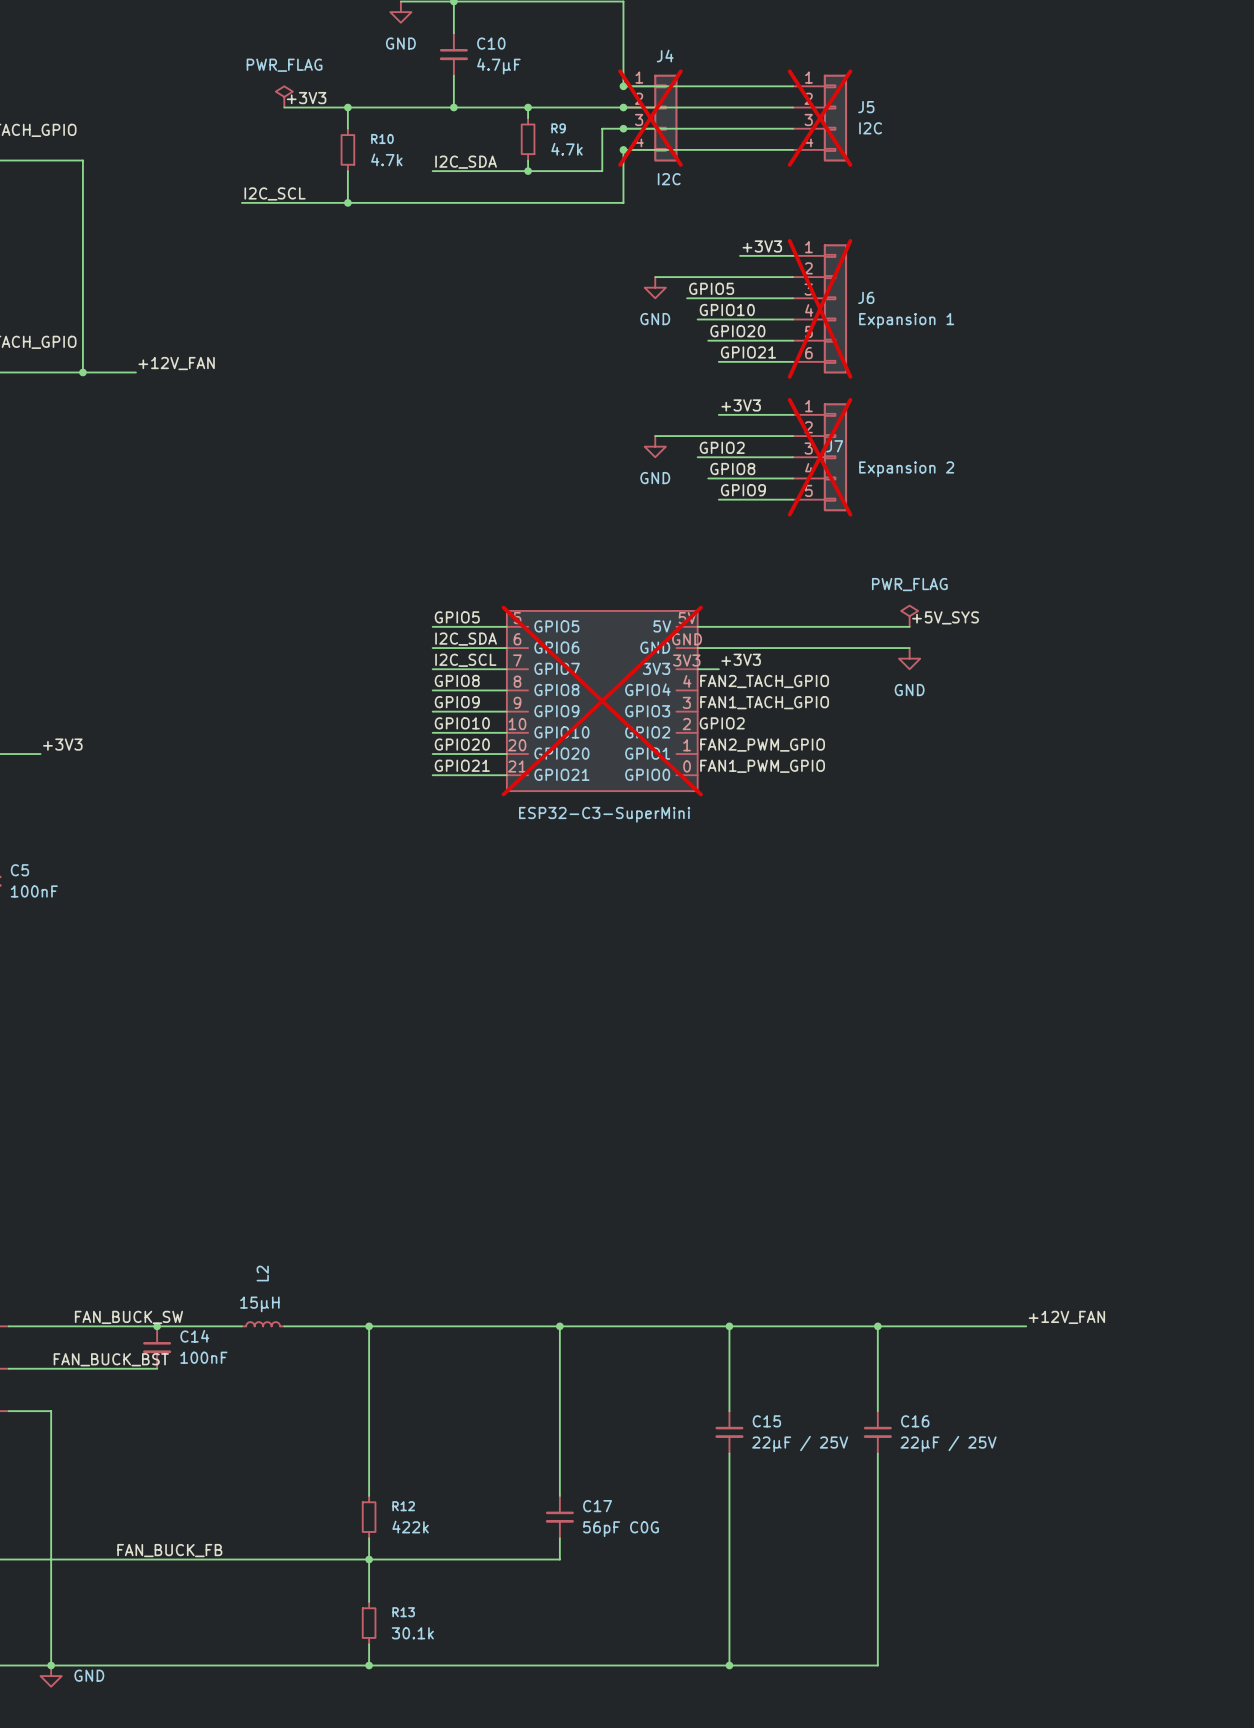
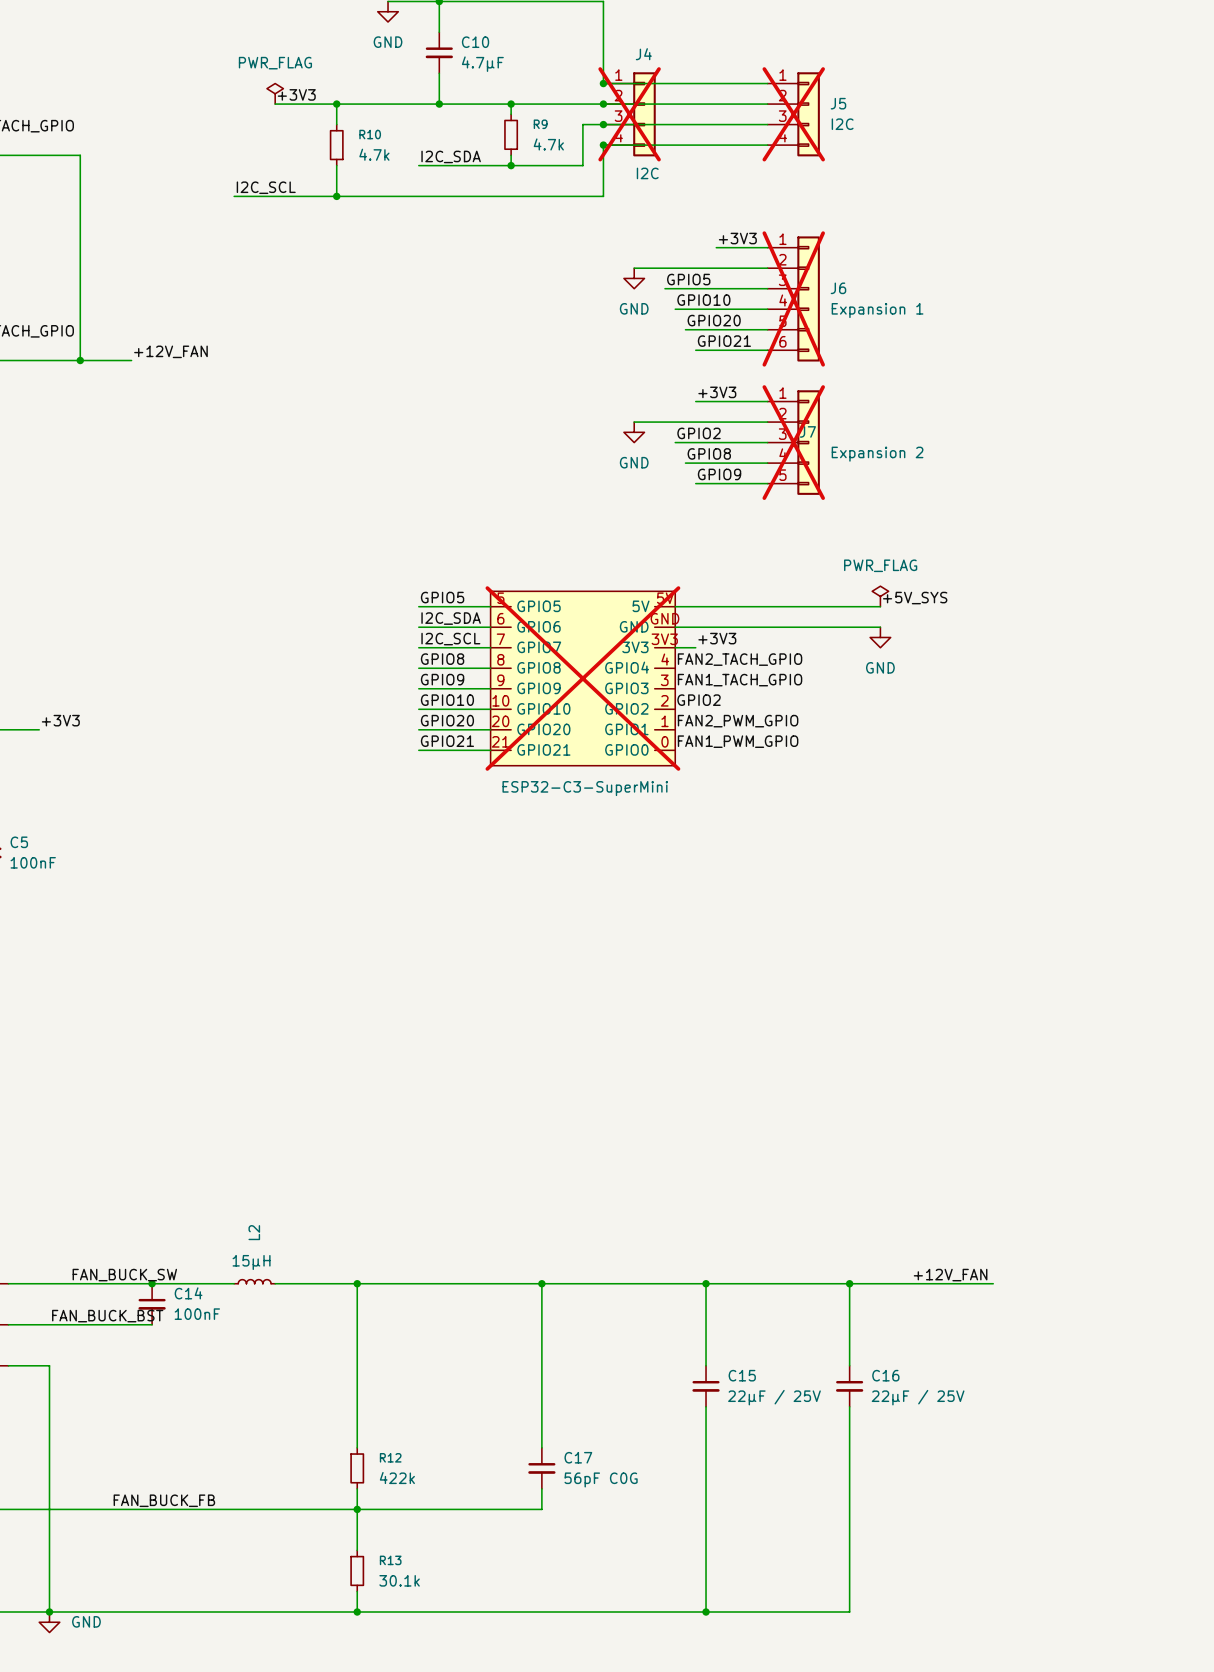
label position: +12V_FAN (1066, 1317) -> +12V_FAN (950, 1275)

